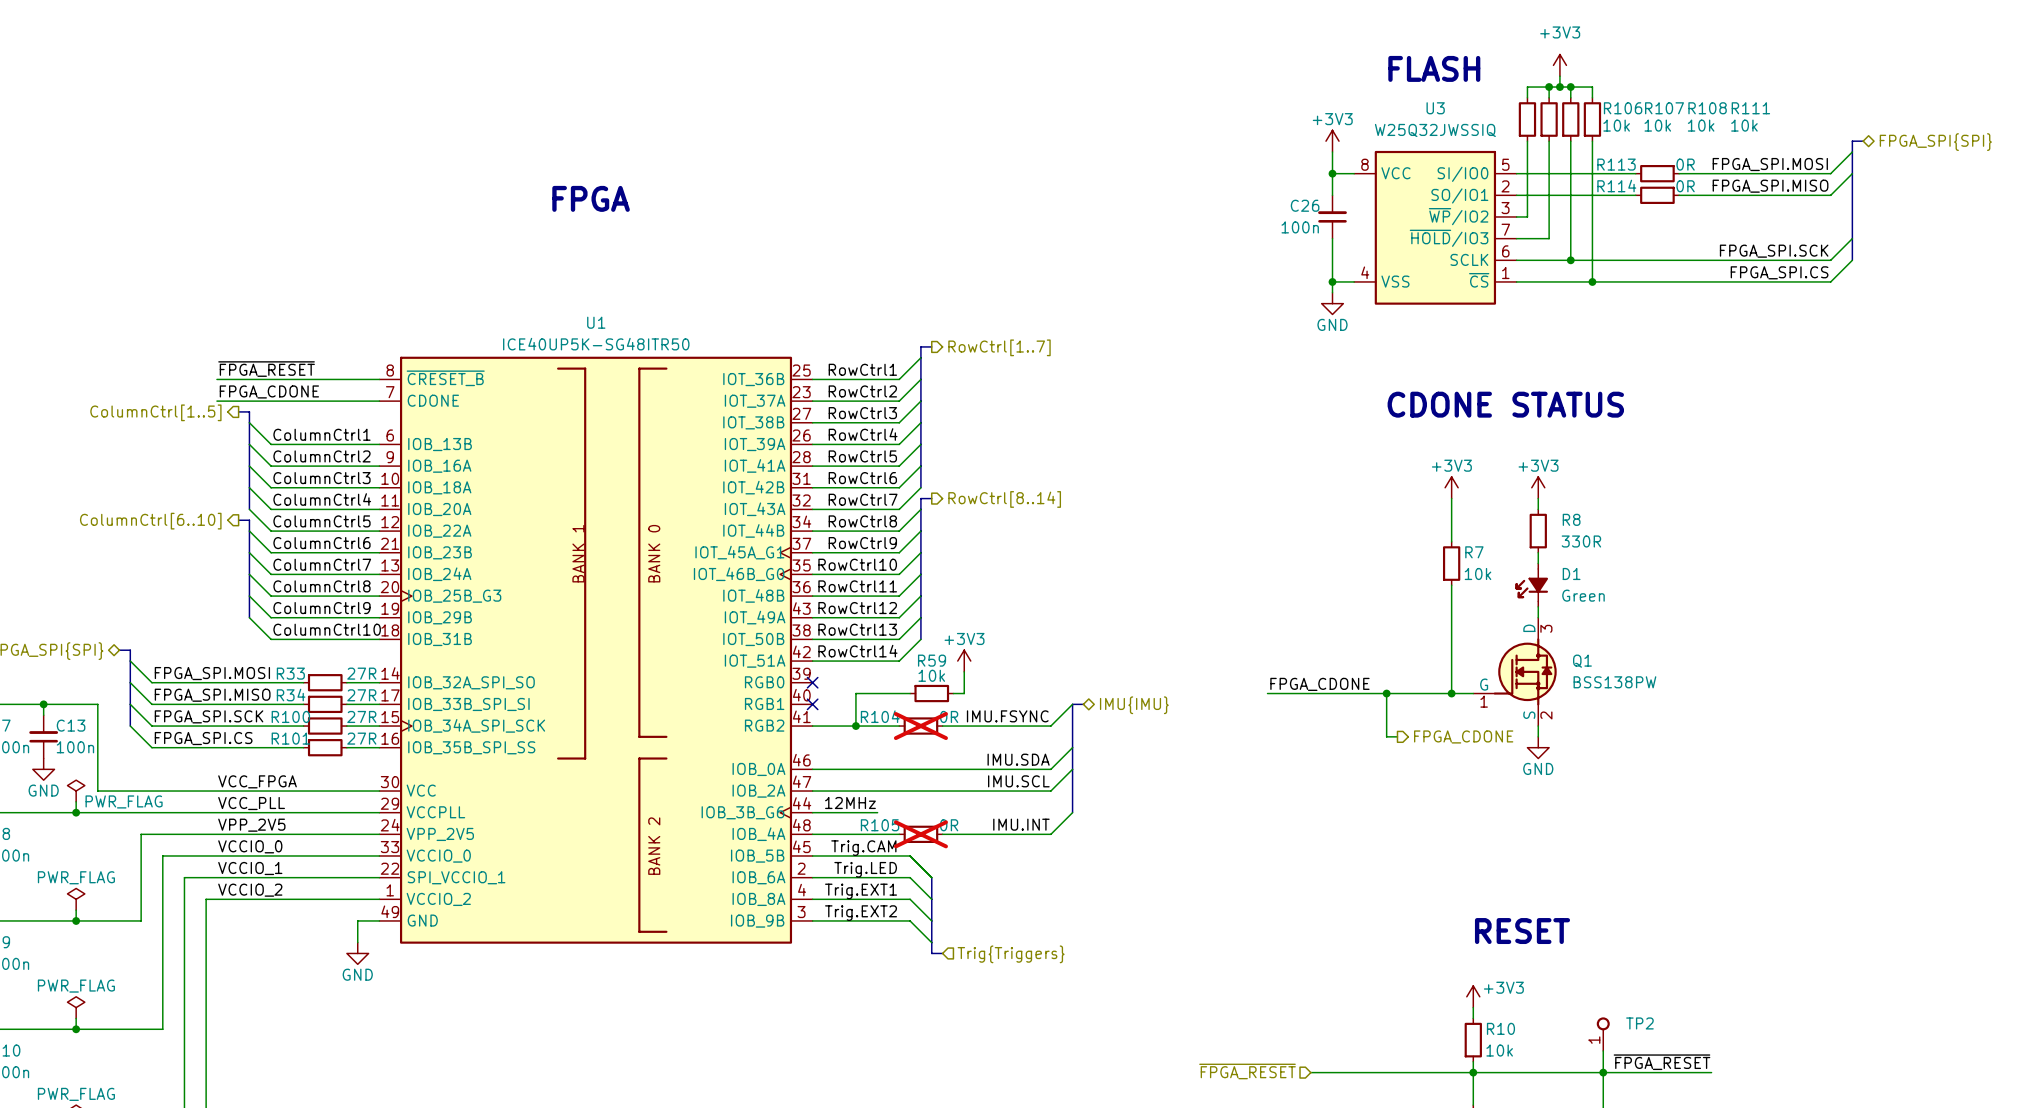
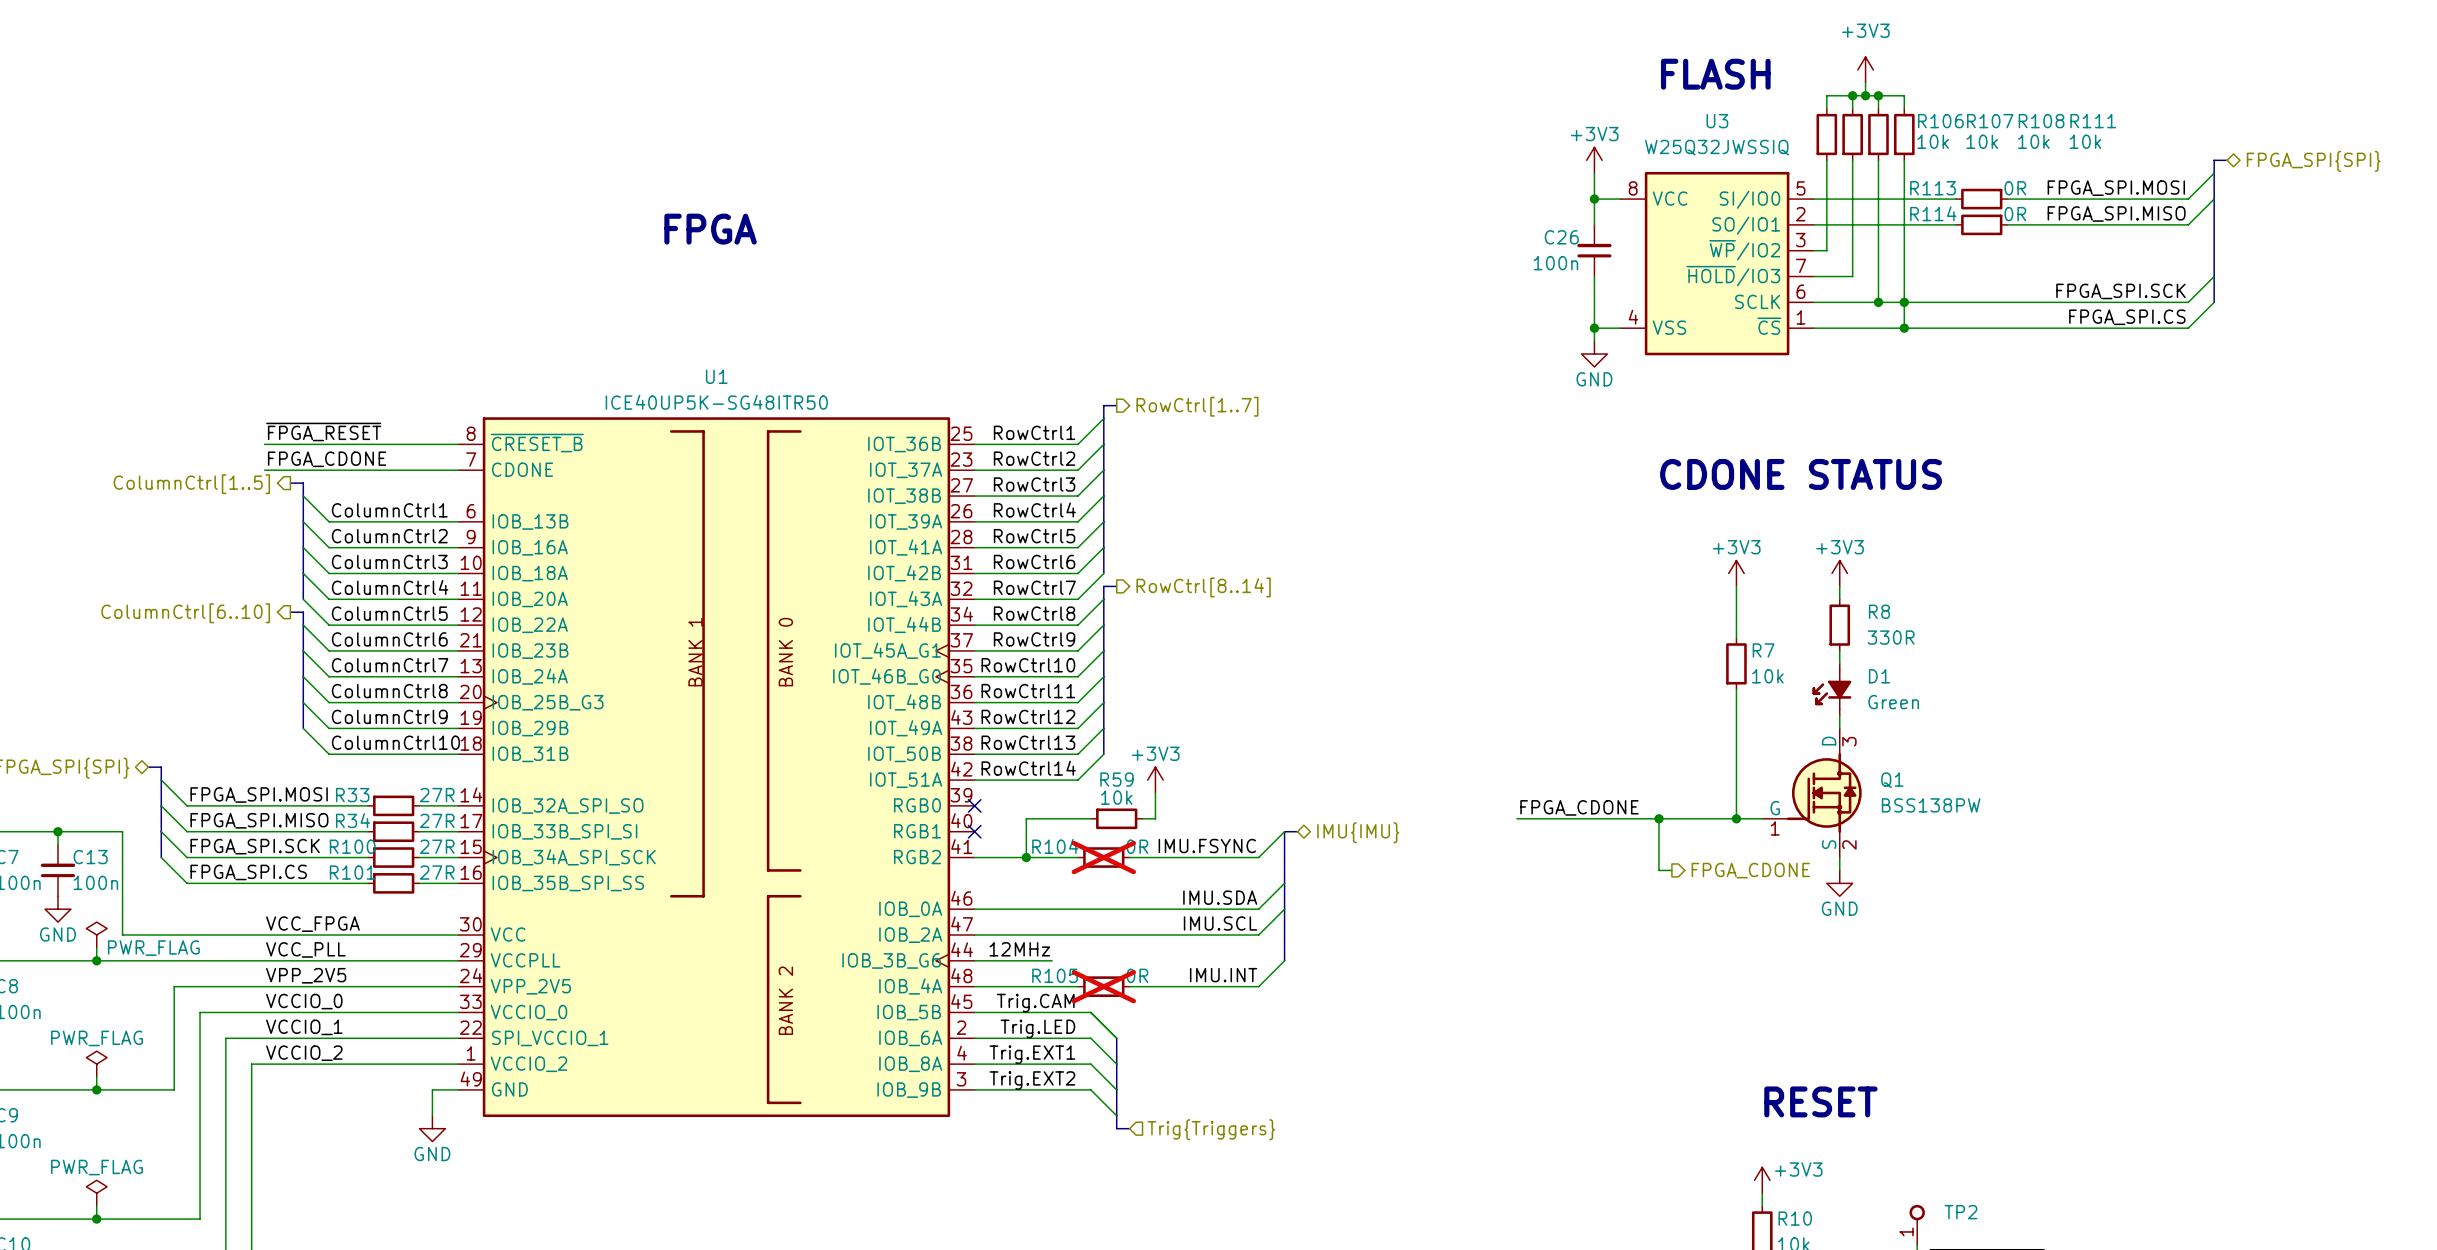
junction: none -> (1904, 302)

